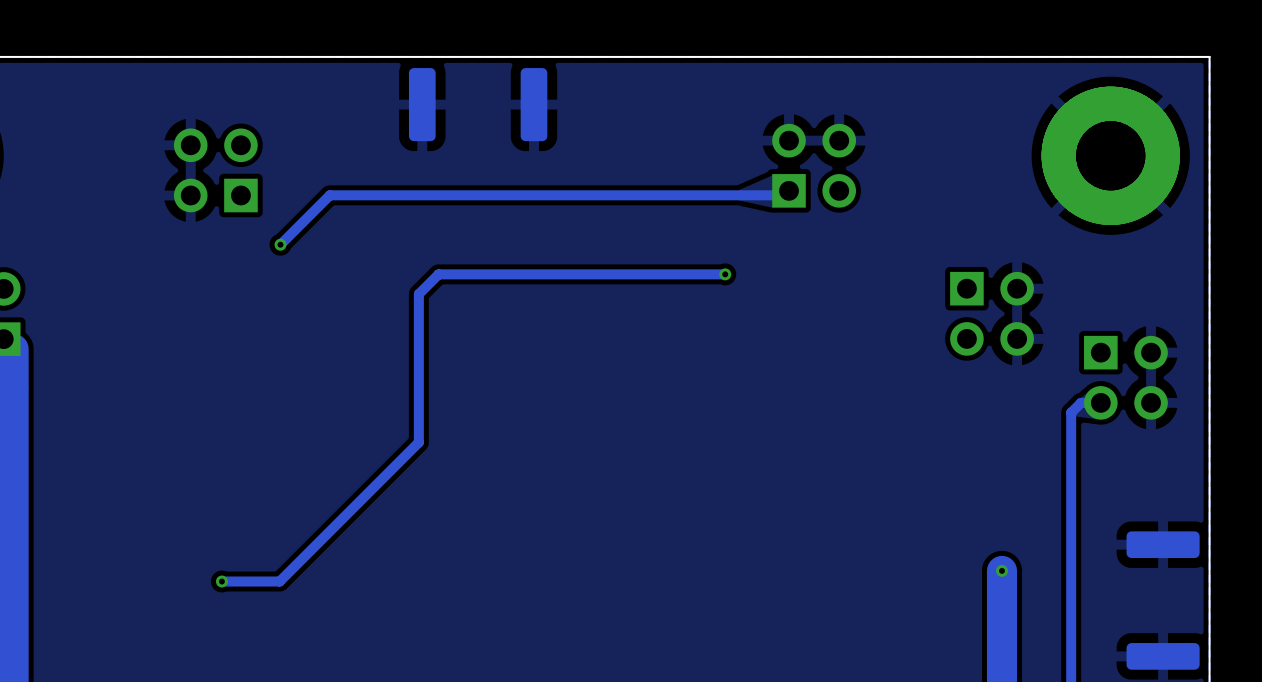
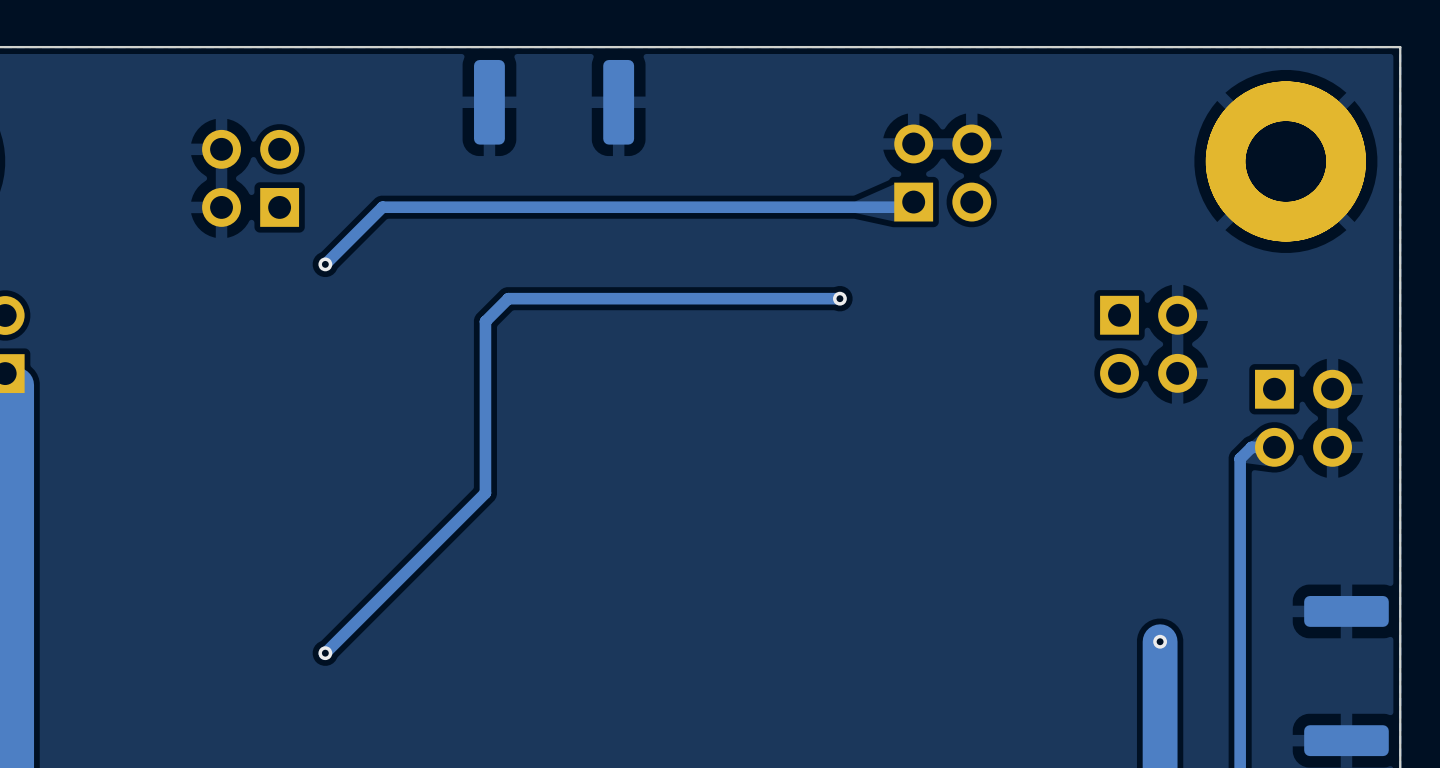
via position: (221, 581) -> (325, 653)
track: (279, 581) (221, 581) -> none

